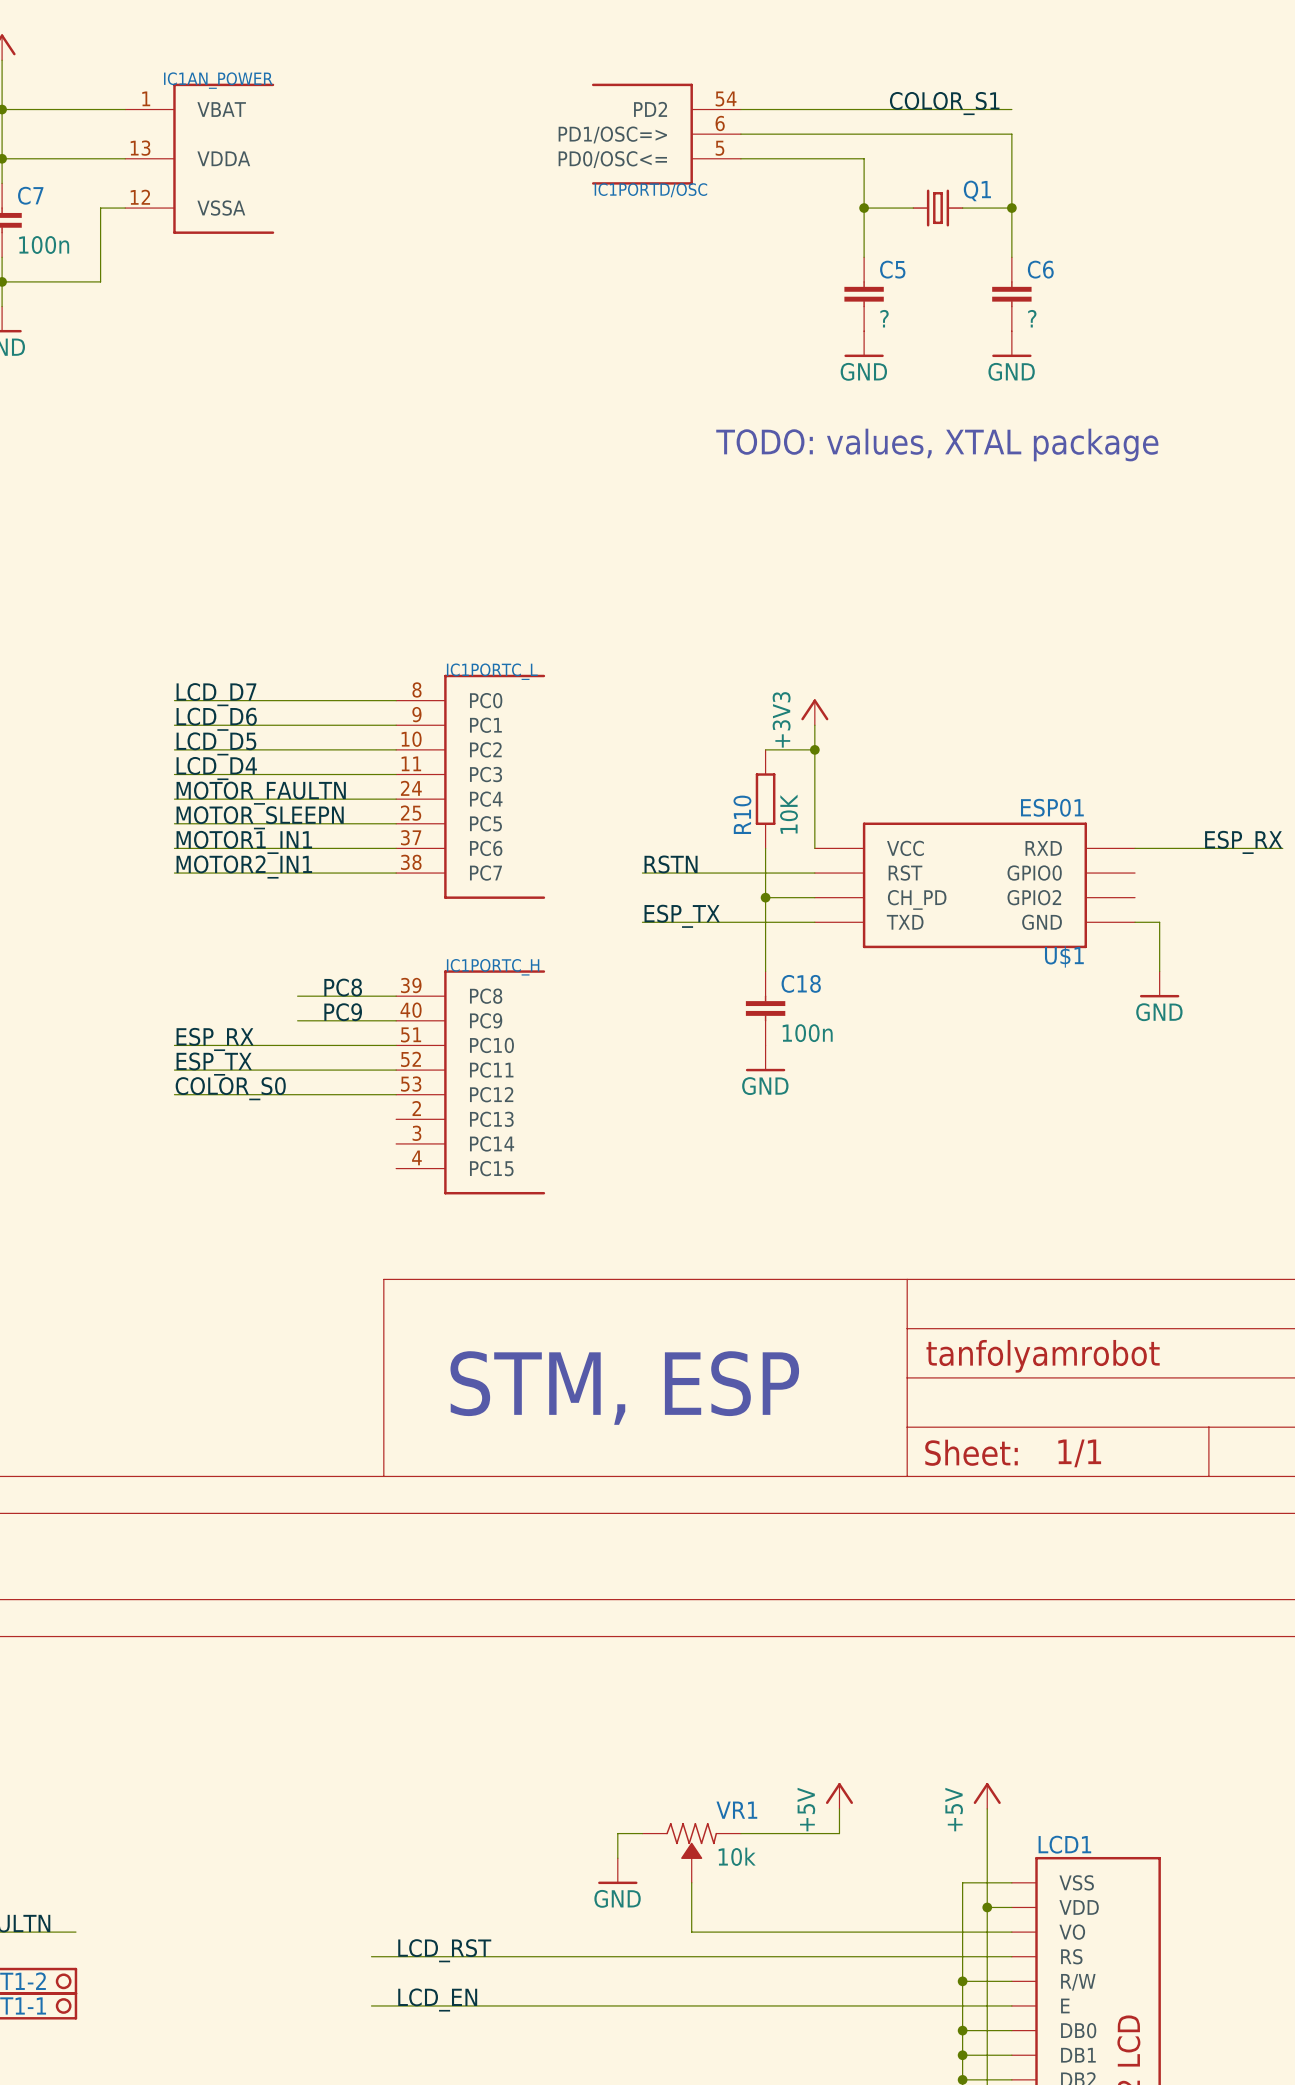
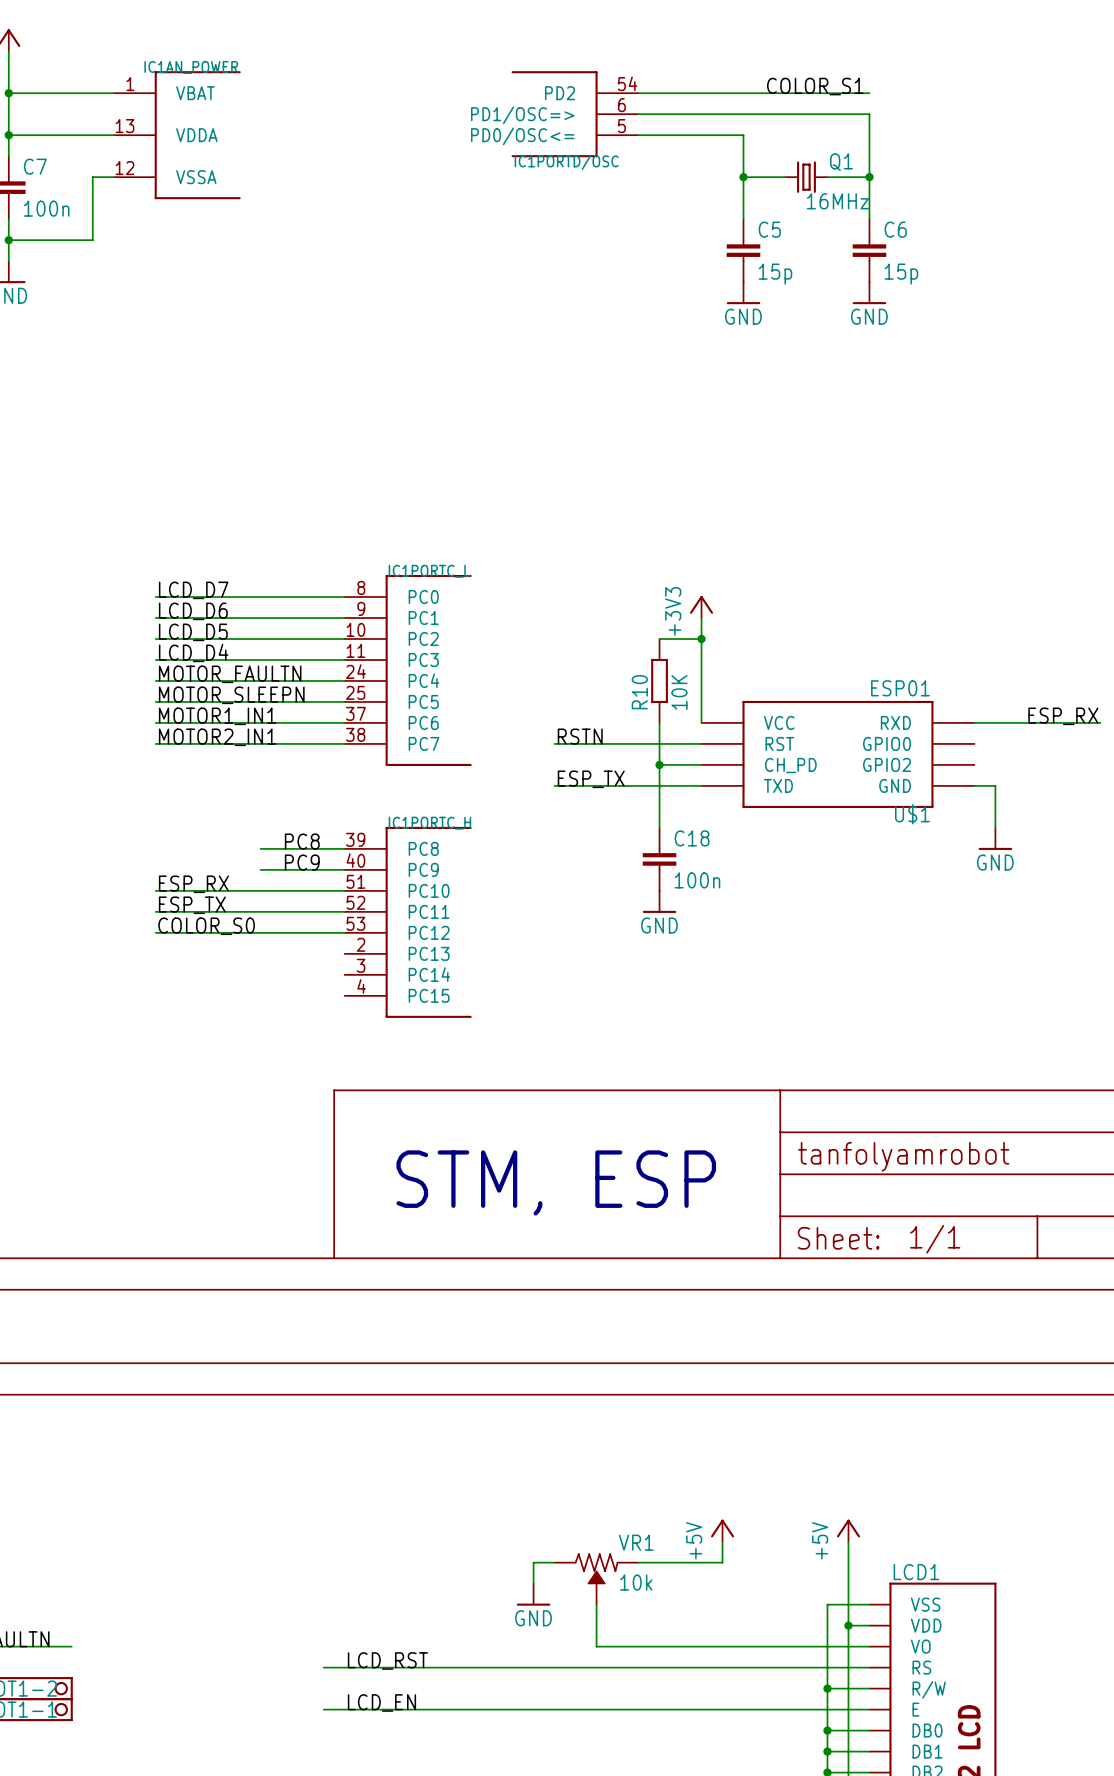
Q1 value: none -> 16MHz (837, 201)
C5 value: ? (884, 318) -> 15p (775, 274)
C6 value: ? (1032, 318) -> 15p (901, 274)
text: TODO: values, XTAL package (937, 445) -> none

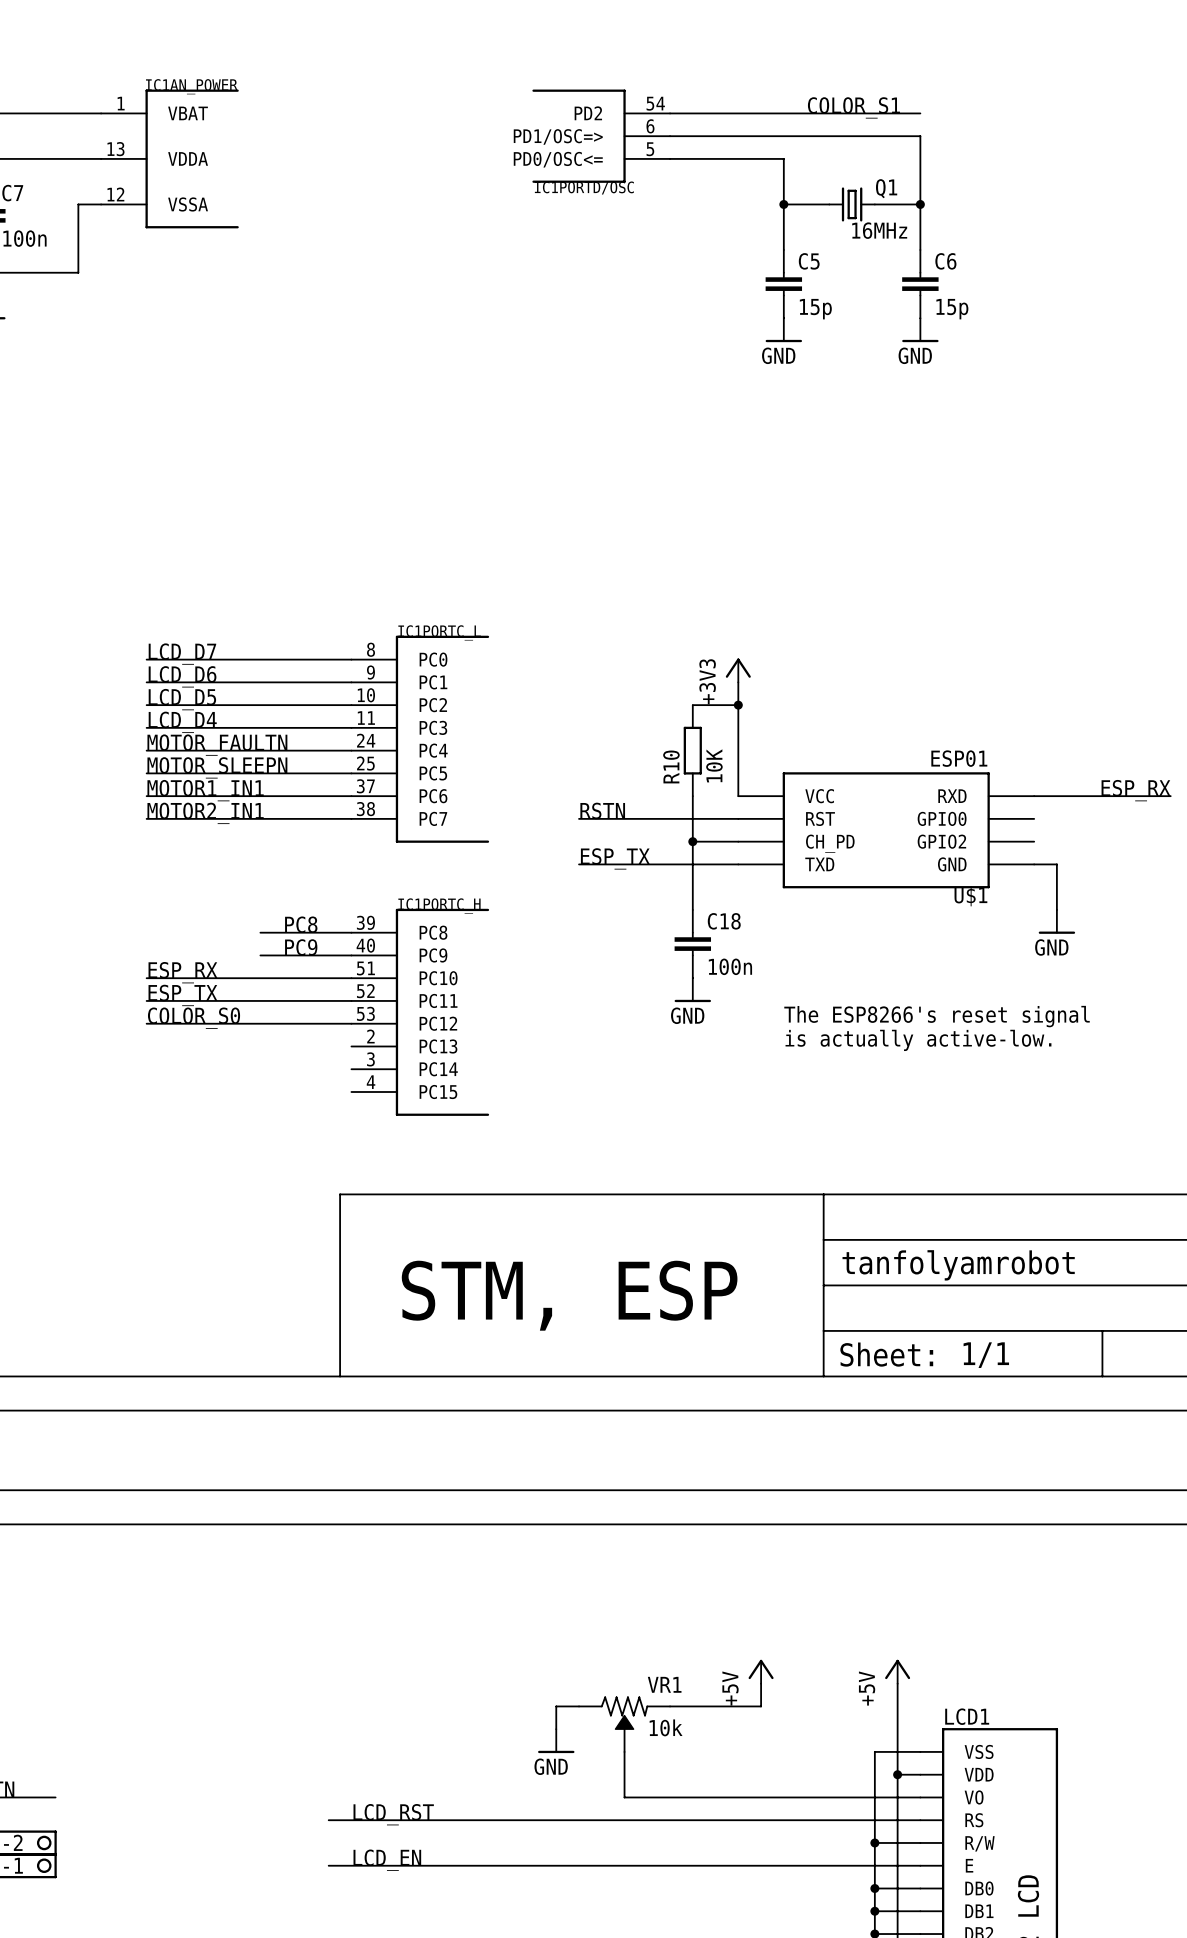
text: none -> The ESP8266's reset signal (937, 1016)
text: none -> is actually active-low. (918, 1040)

